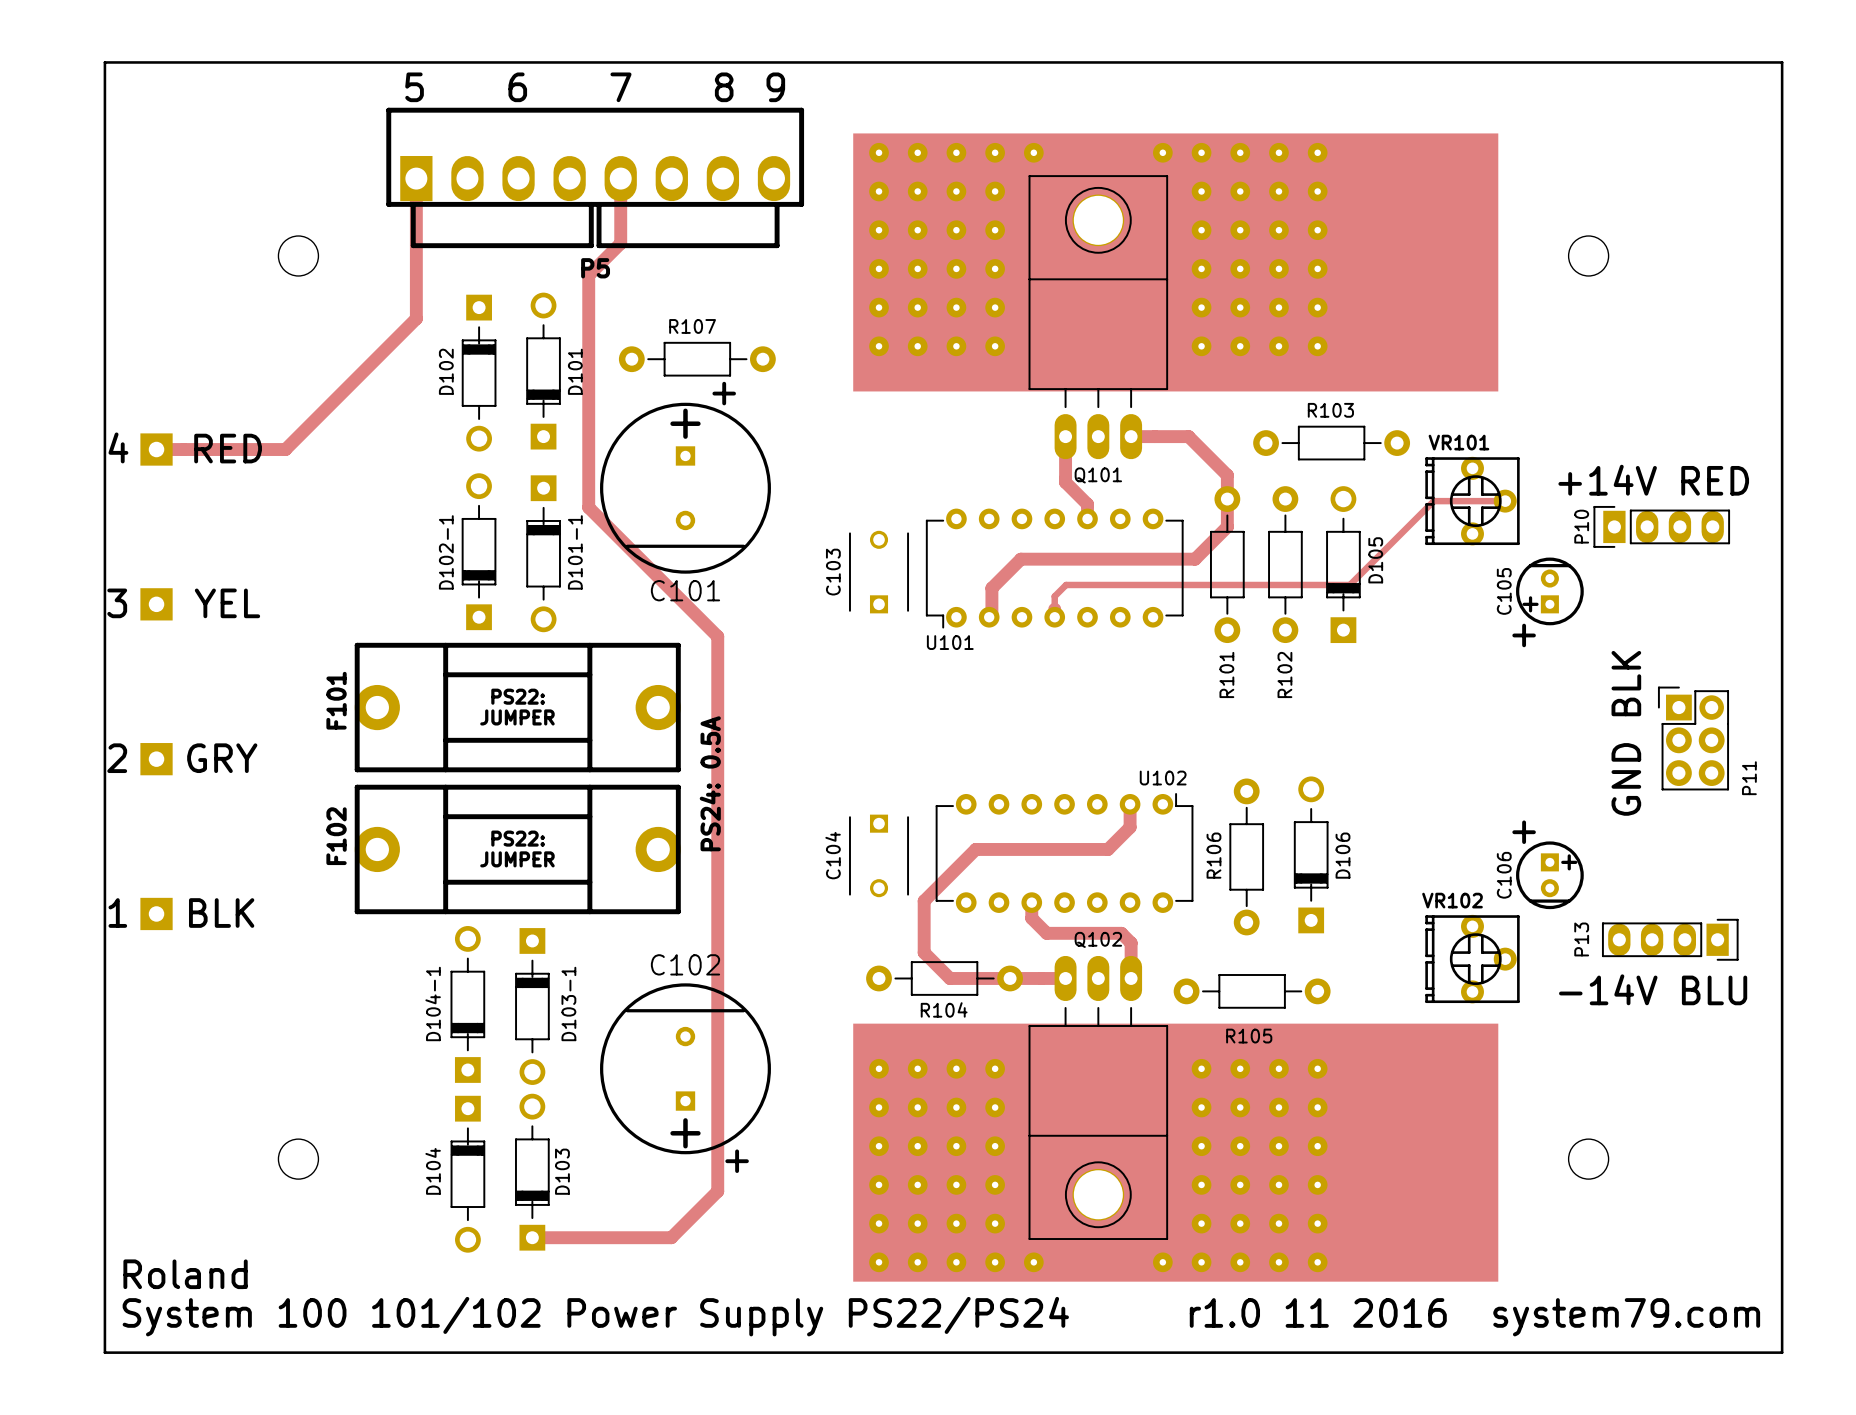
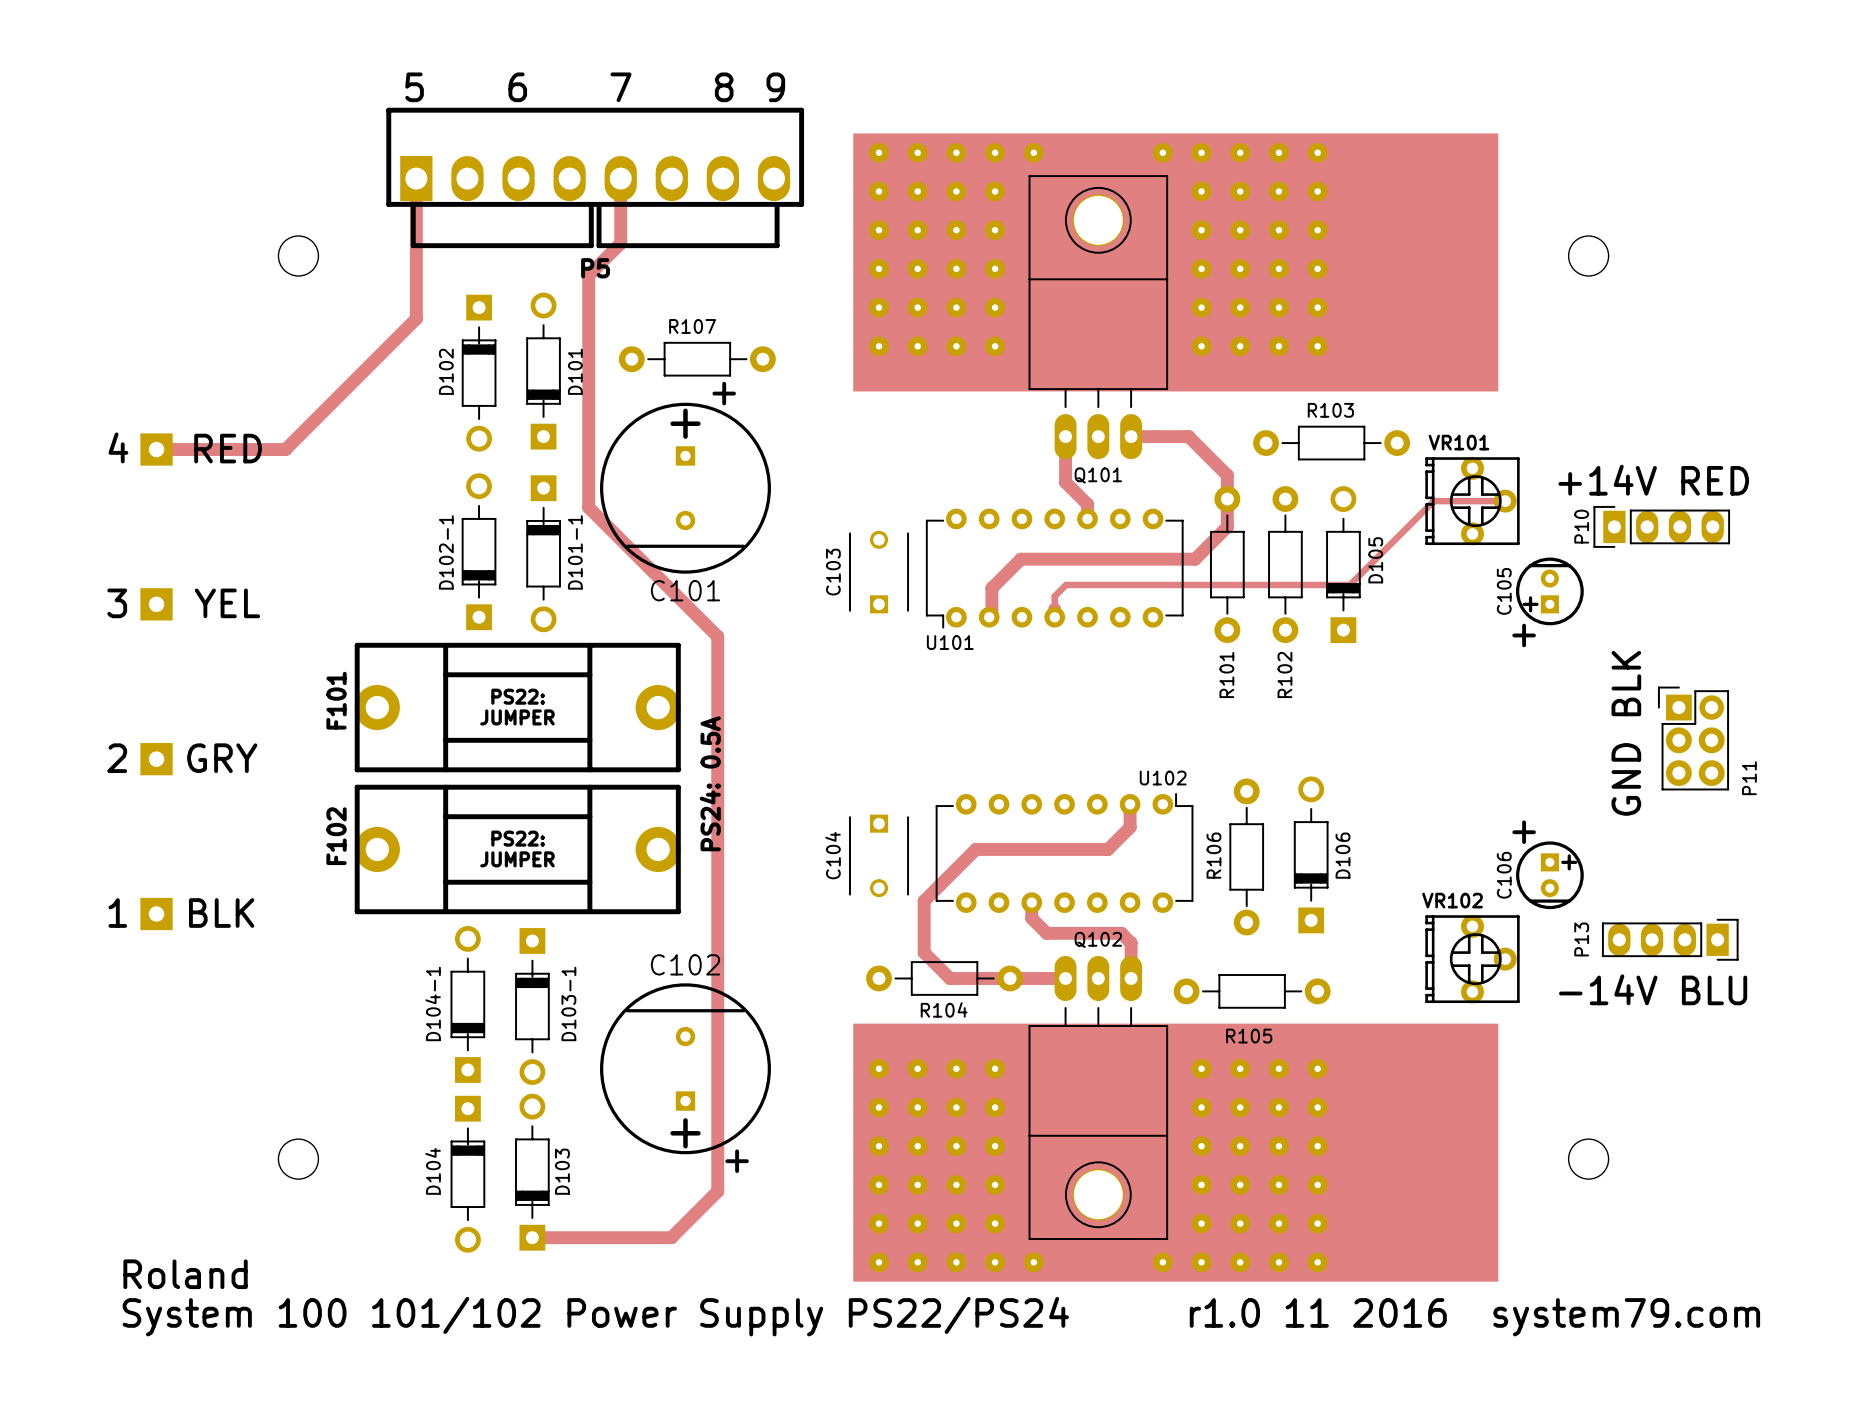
board edge: (104, 62) (104, 1352) (1782, 1352) (1782, 62) (104, 62) -> none

